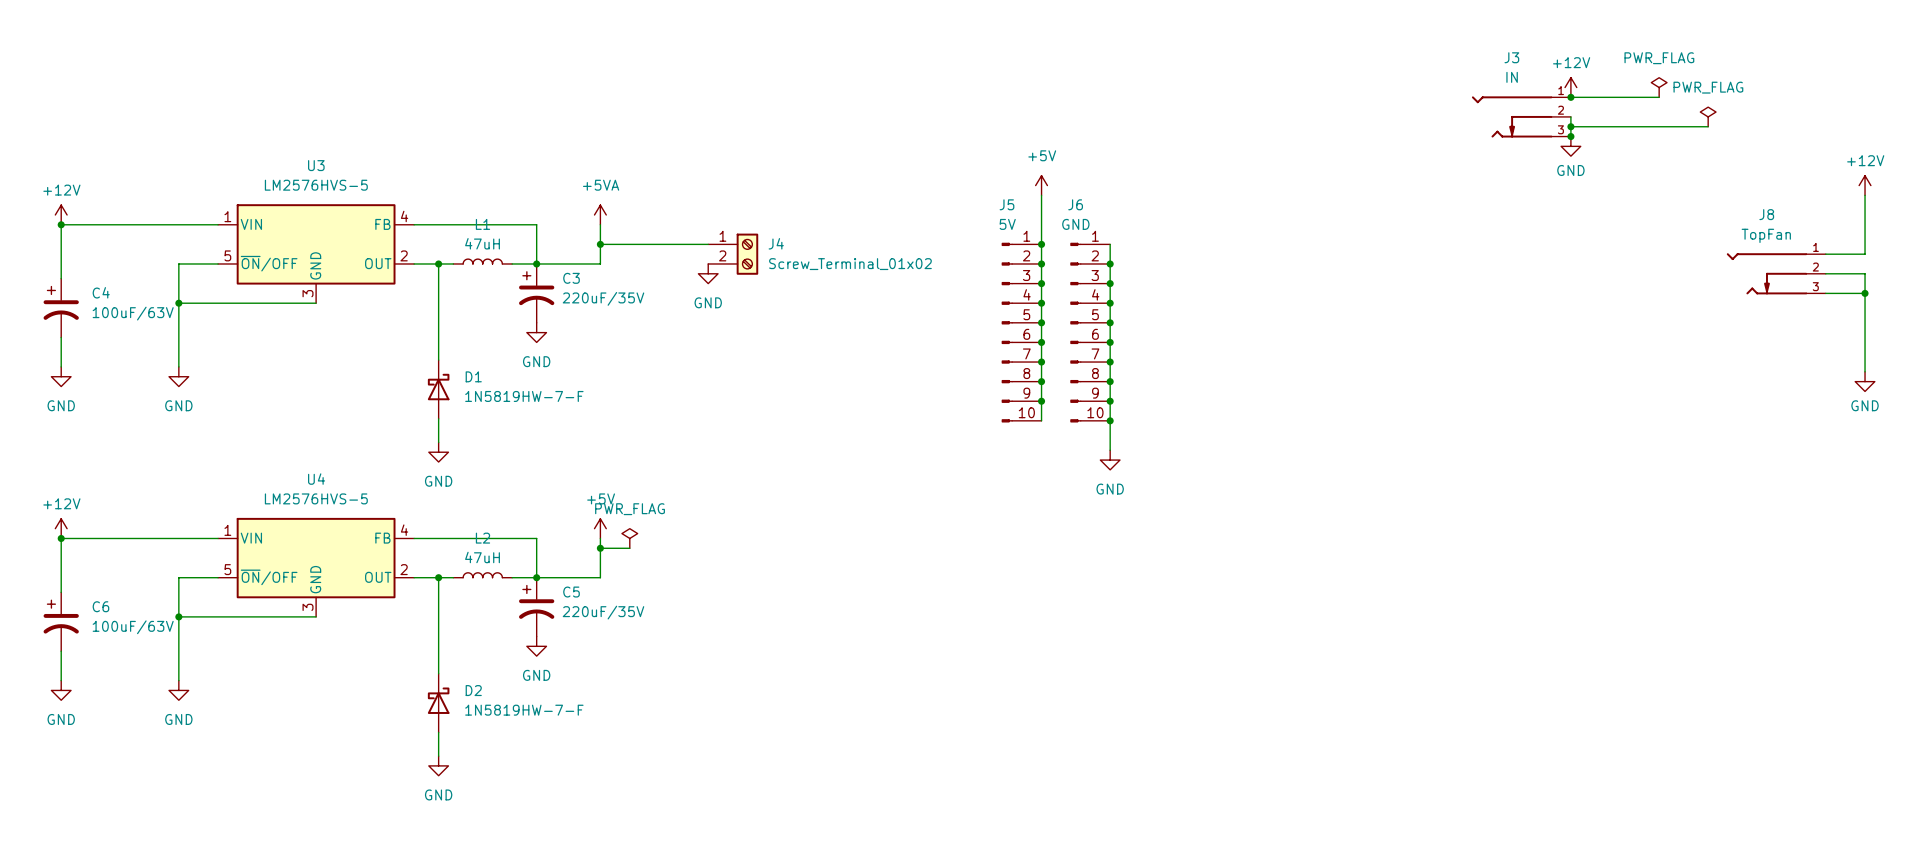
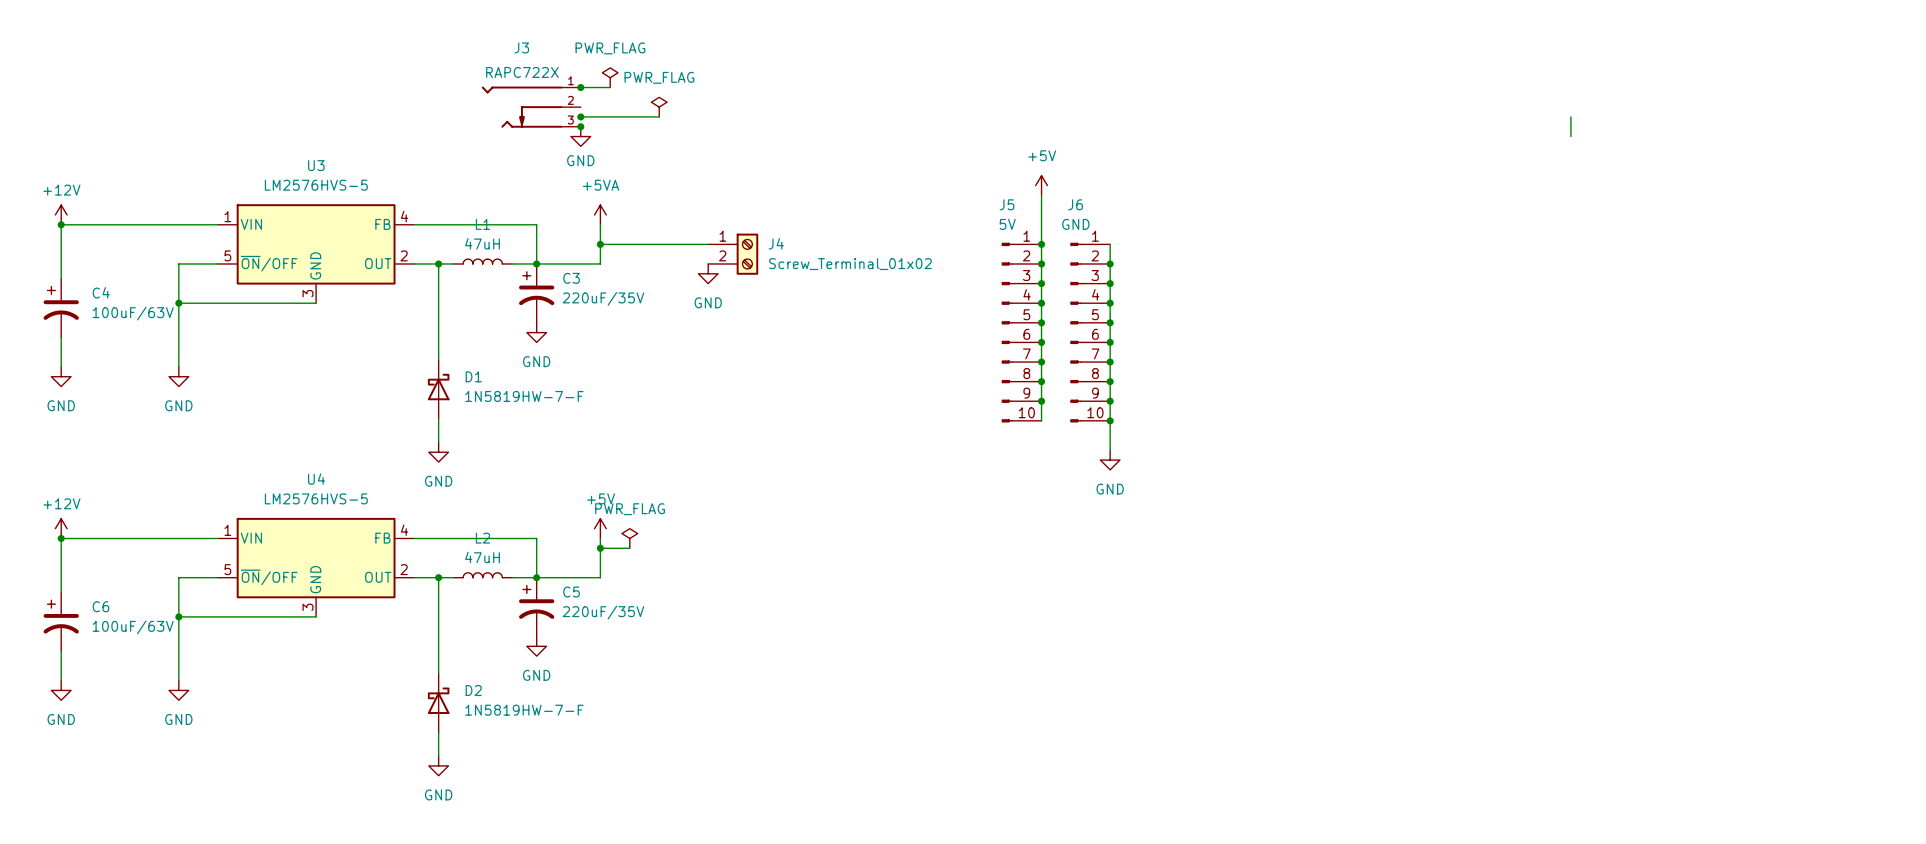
power symbol: none -> PWR_FLAG (610, 77)
J3 value: IN (1512, 77) -> RAPC722X (522, 72)
wire: none -> (580, 87) (610, 87)
junction: none -> (580, 87)
power symbol: +12V (1570, 87) -> none
power symbol: PWR_FLAG (1659, 87) -> none
wire: (1570, 97) (1659, 97) -> none
junction: (1570, 97) -> none
power symbol: none -> PWR_FLAG (659, 107)
wire: none -> (580, 116) (659, 116)
junction: none -> (580, 116)
J3 position: (1521, 116) -> (531, 107)
power symbol: PWR_FLAG (1708, 116) -> none
junction: none -> (580, 126)
wire: (1570, 126) (1708, 126) -> none
junction: (1570, 126) -> none
power symbol: none -> GND (580, 136)
junction: (1570, 136) -> none
power symbol: GND (1570, 146) -> none
power symbol: +12V (1865, 185) -> none
wire: (1865, 195) (1865, 254) (1825, 254) -> none
J8: TopFan (1776, 273) -> none
wire: (1825, 273) (1865, 273) (1865, 371) -> none
wire: (1825, 293) (1865, 293) -> none
junction: (1865, 293) -> none
power symbol: GND (1865, 381) -> none

